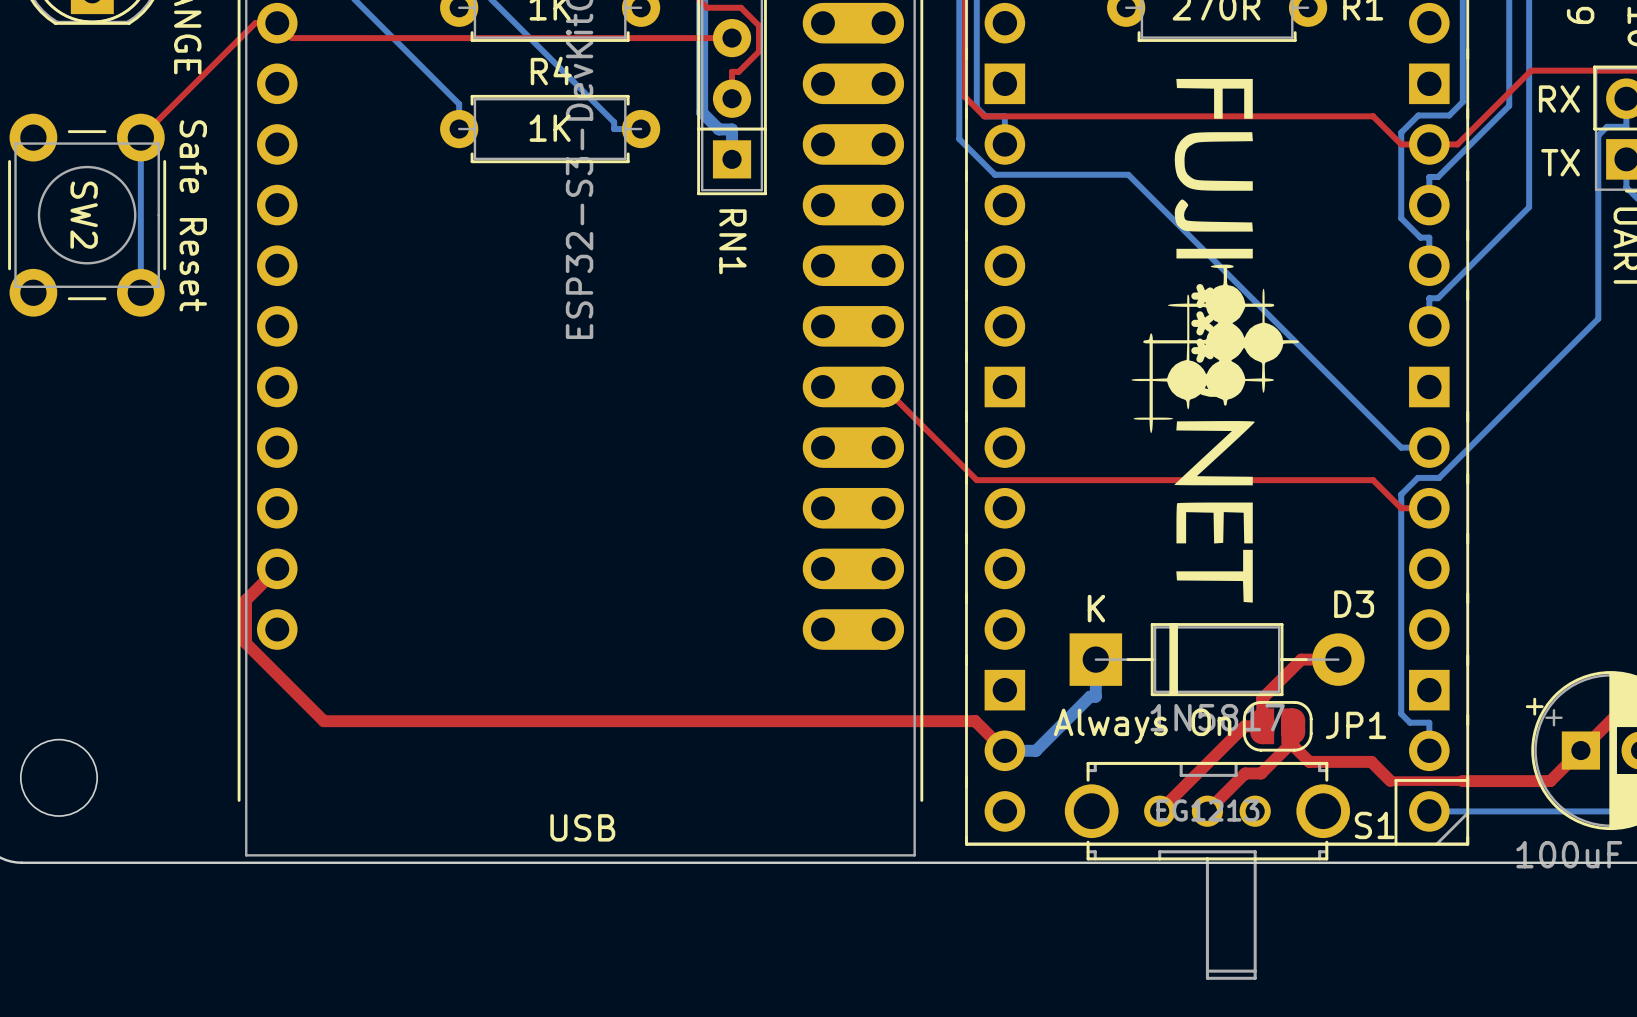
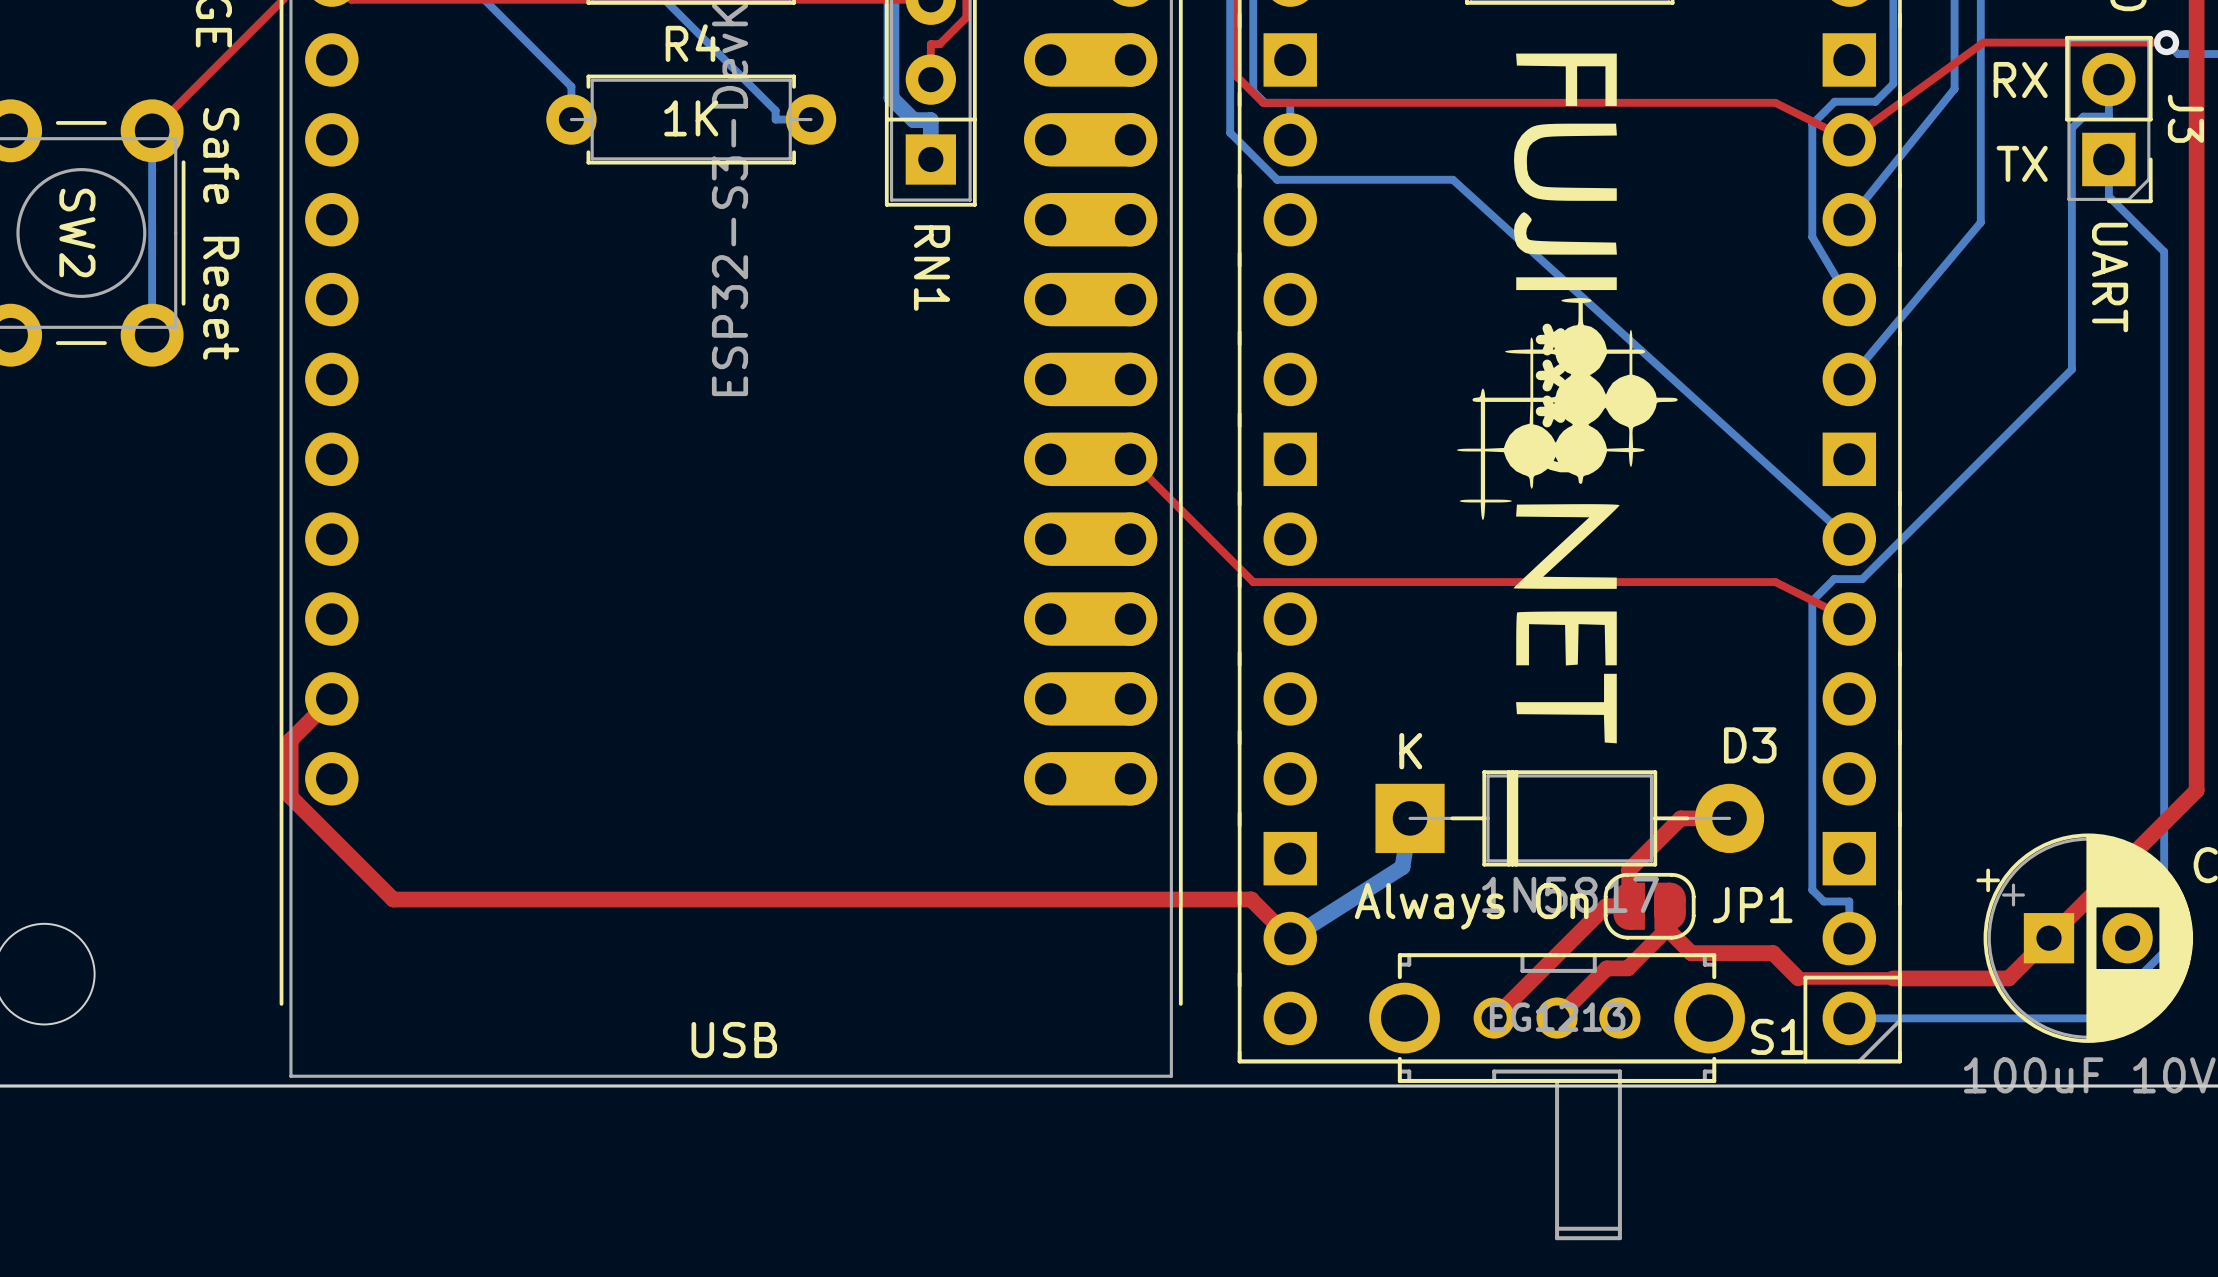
top track: (1531, 70) (1457, 144) (1401, 144) (1373, 116) -> (1983, 42) (1849, 139) (1775, 102)
bottom track: (1509, 105) (1438, 176) (1429, 176) (1429, 205) -> (1954, 88) (1849, 219)
bottom track: (1128, 174) (1401, 447) (1429, 447) -> (1452, 179) (1849, 539)
bottom track: (1529, 207) (1438, 298) (1429, 298) (1429, 326) -> (1980, 222) (1849, 379)
bottom track: (1401, 218) (1420, 237) (1429, 237) (1429, 265) -> (1812, 237) (1849, 299)
top track: (1373, 480) (1401, 508) (1429, 508) -> (1775, 582) (1849, 619)
bottom track: (1095, 659) (1095, 696) (1090, 696) (1035, 750) (1004, 750) -> (1410, 818) (1402, 867) (1290, 938)

